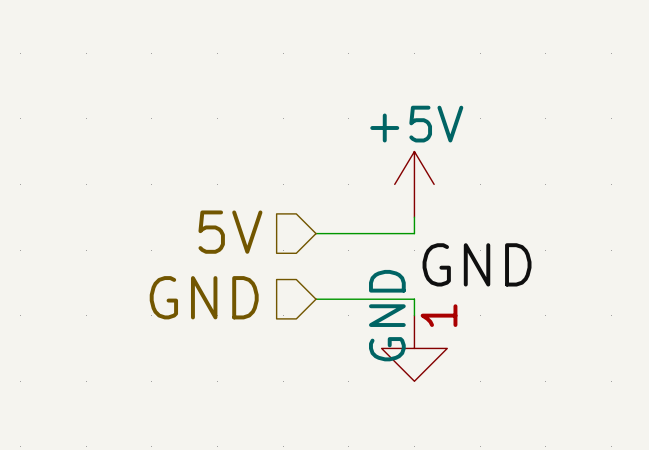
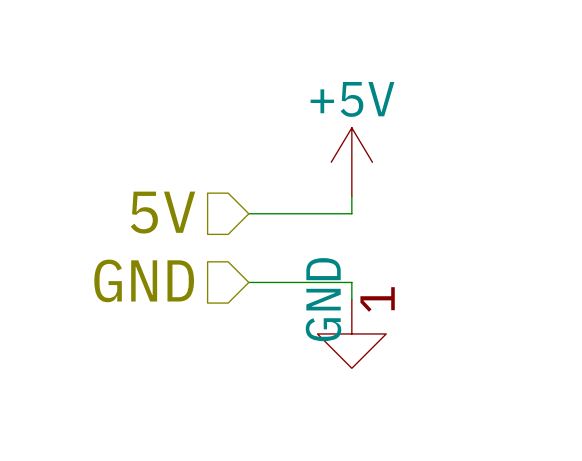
label: GND (477, 264) -> none

